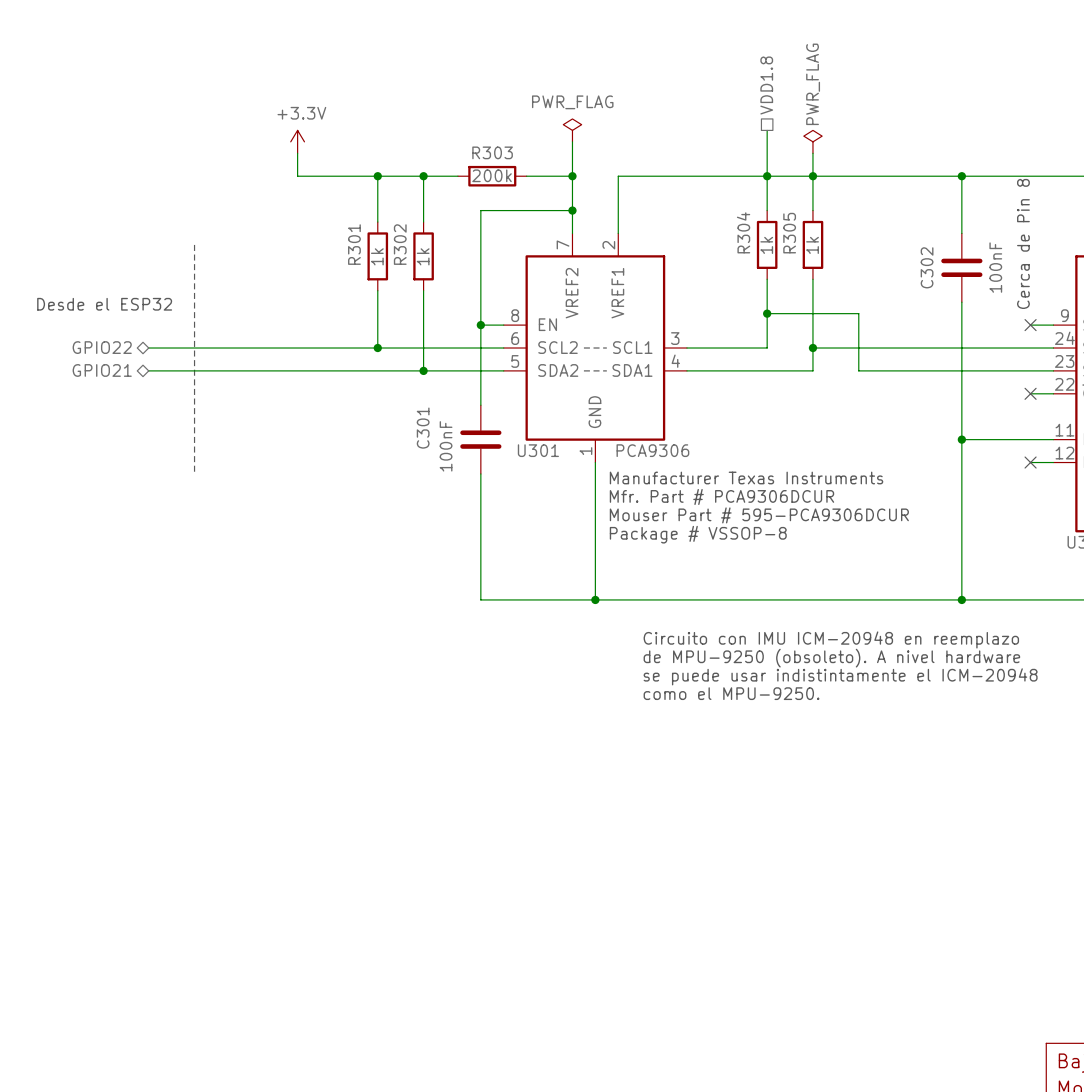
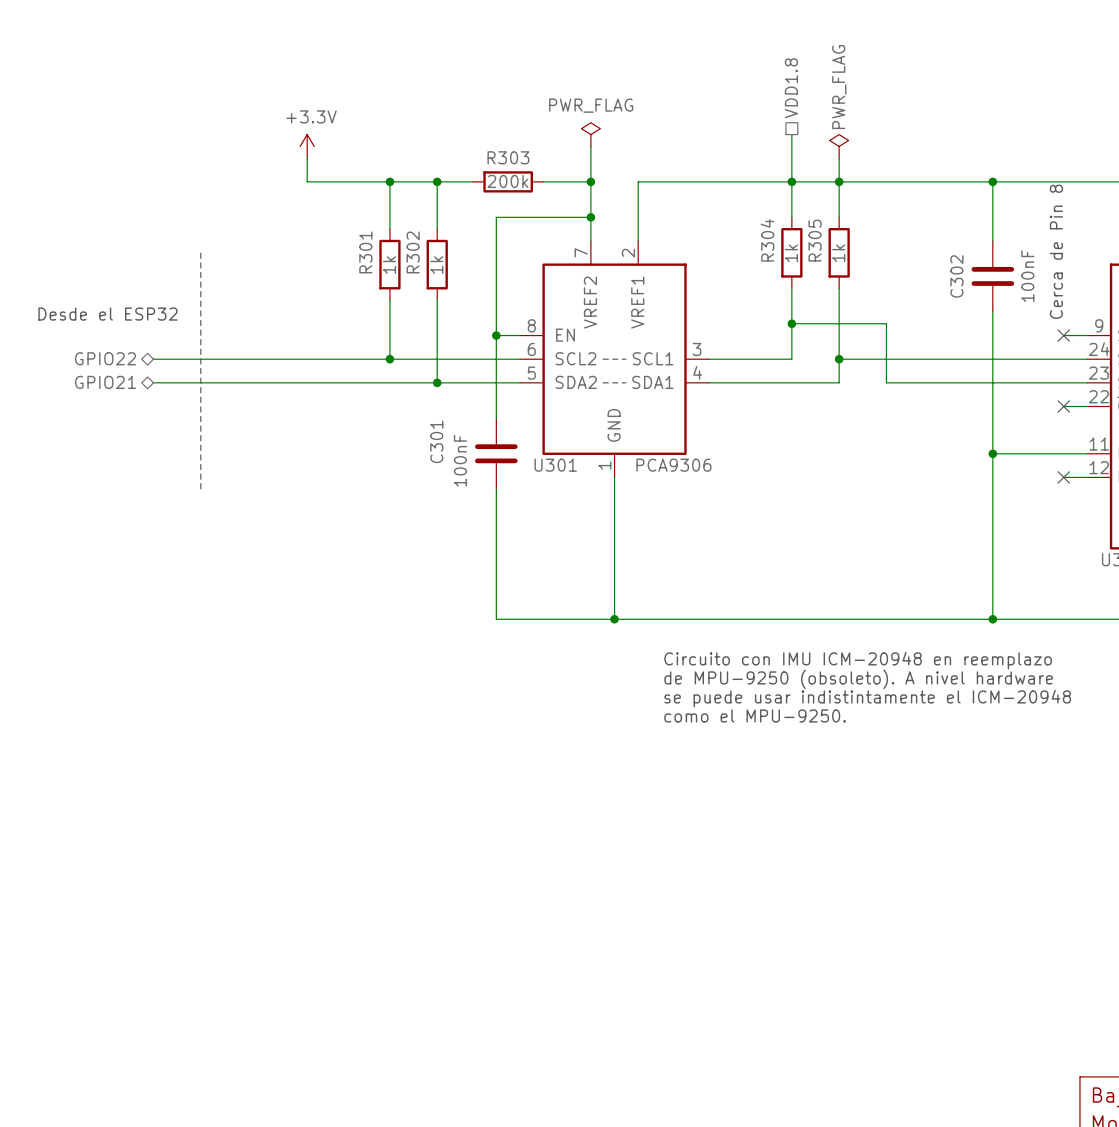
text: Manufacturer Texas Instruments (746, 477) -> none
text: Mfr. Part # PCA9306DCUR (721, 496) -> none
text: Mouser Part # 595-PCA9306DCUR (759, 515) -> none
text: Package # VSSOP-8 (698, 534) -> none

